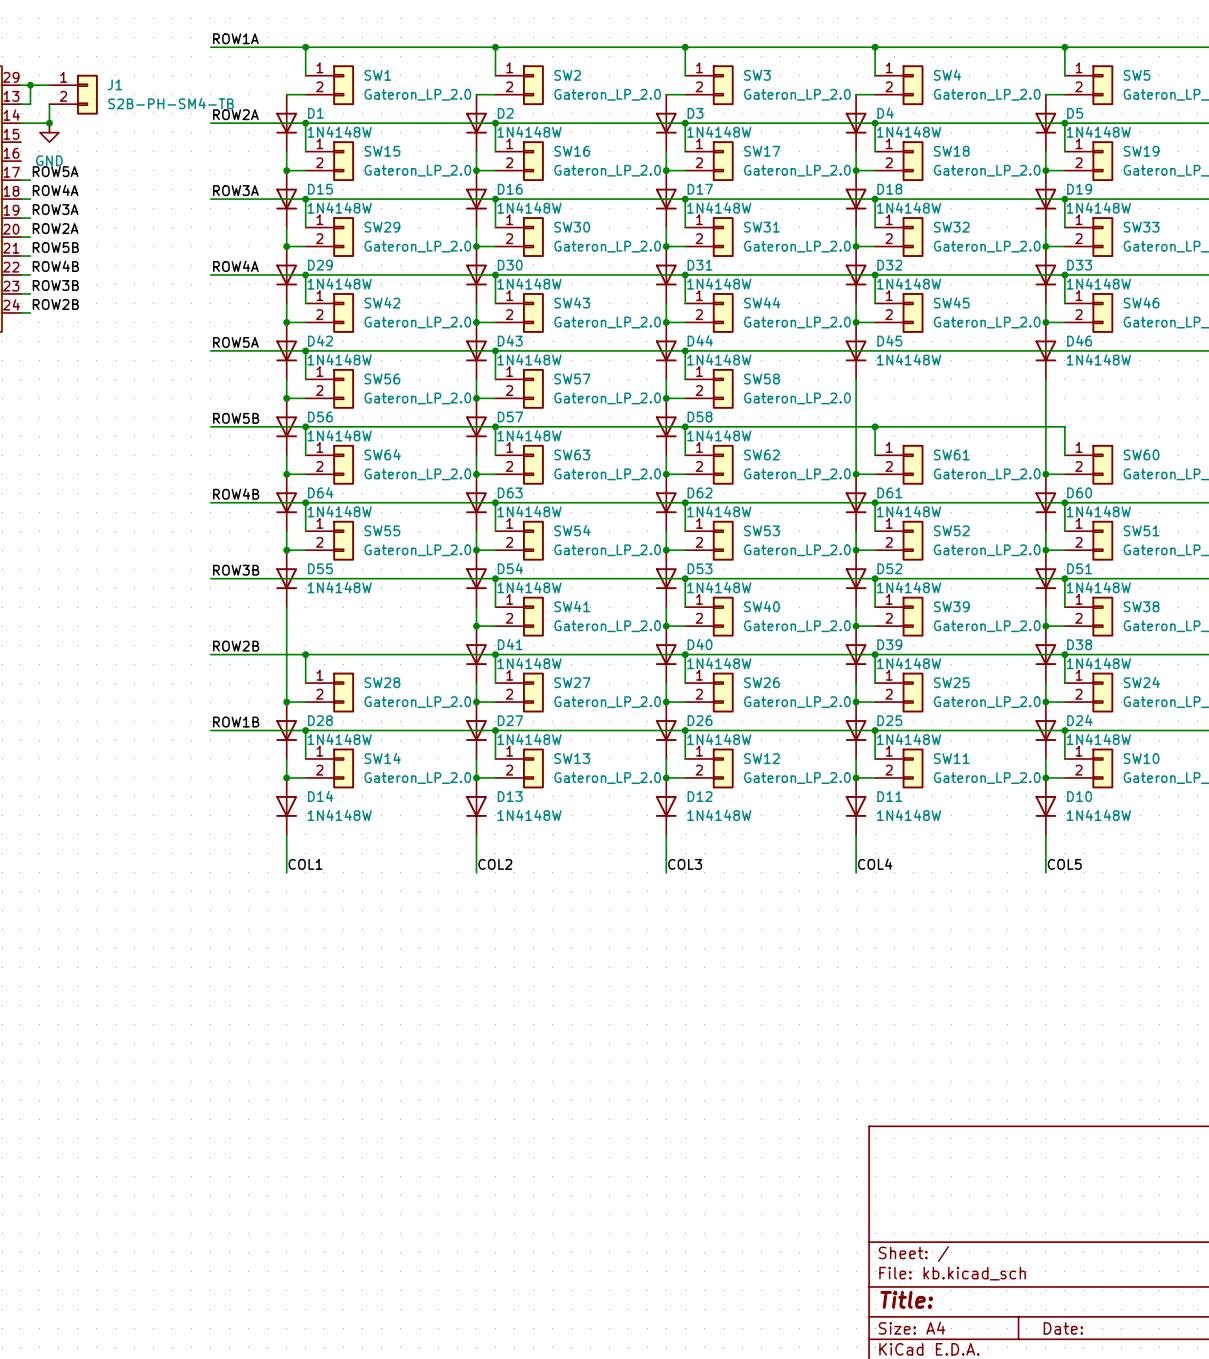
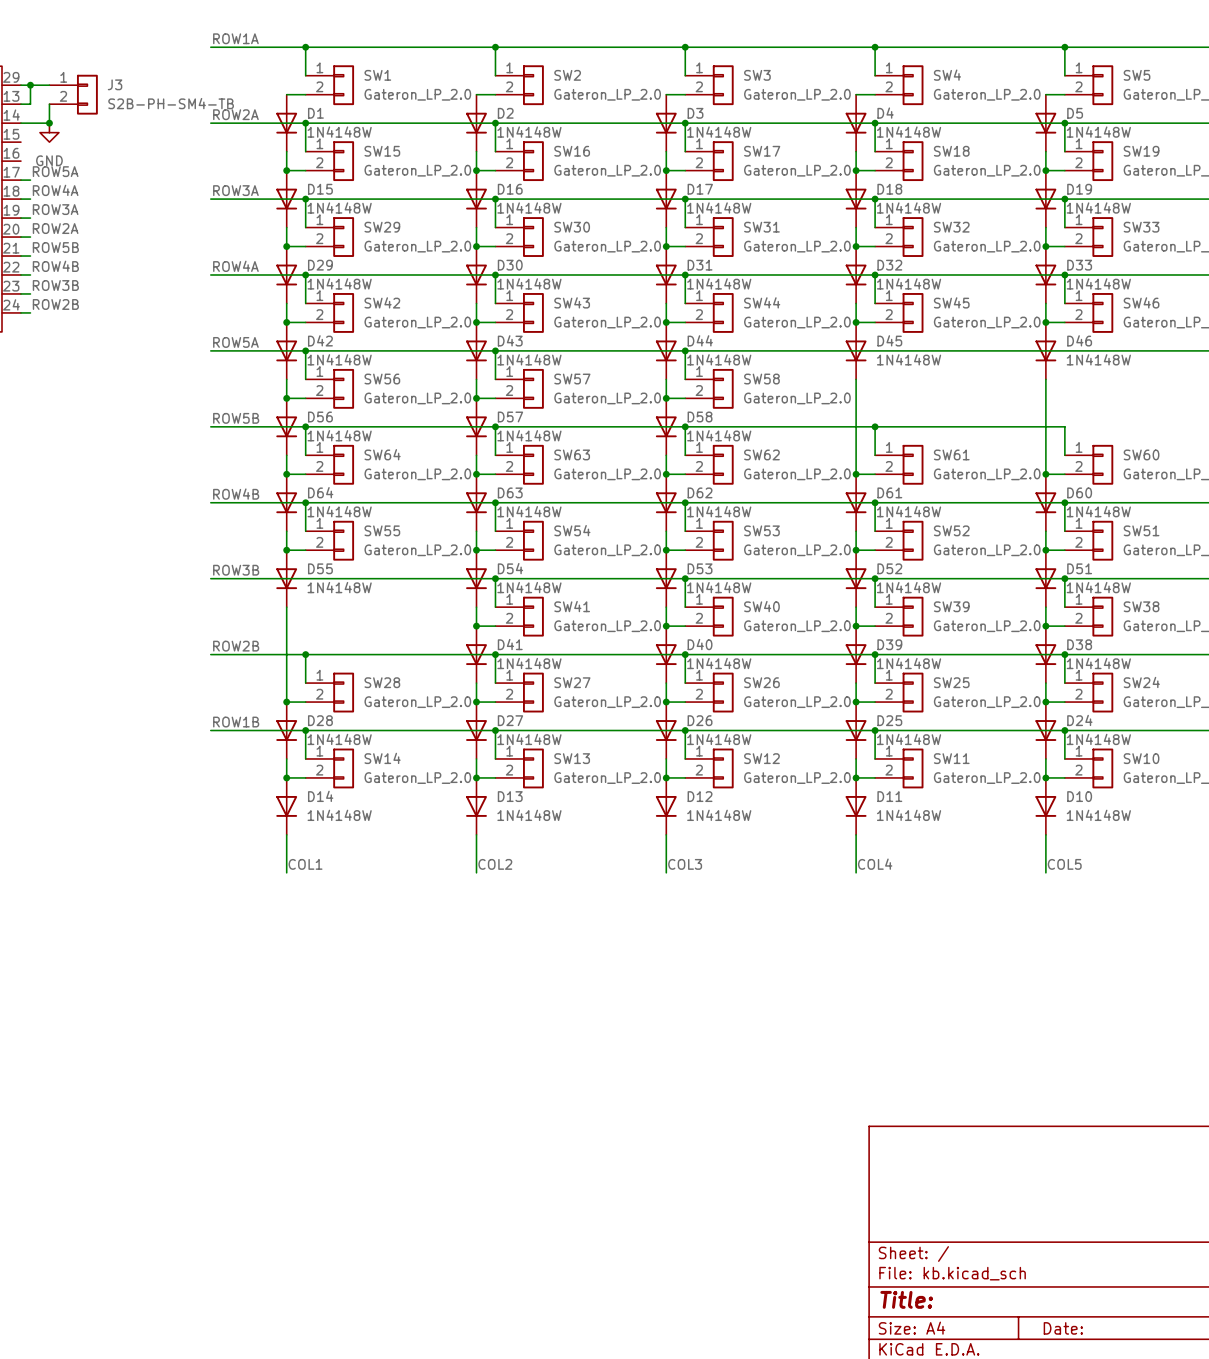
J1 name: J1 (115, 84) -> J3 (115, 84)

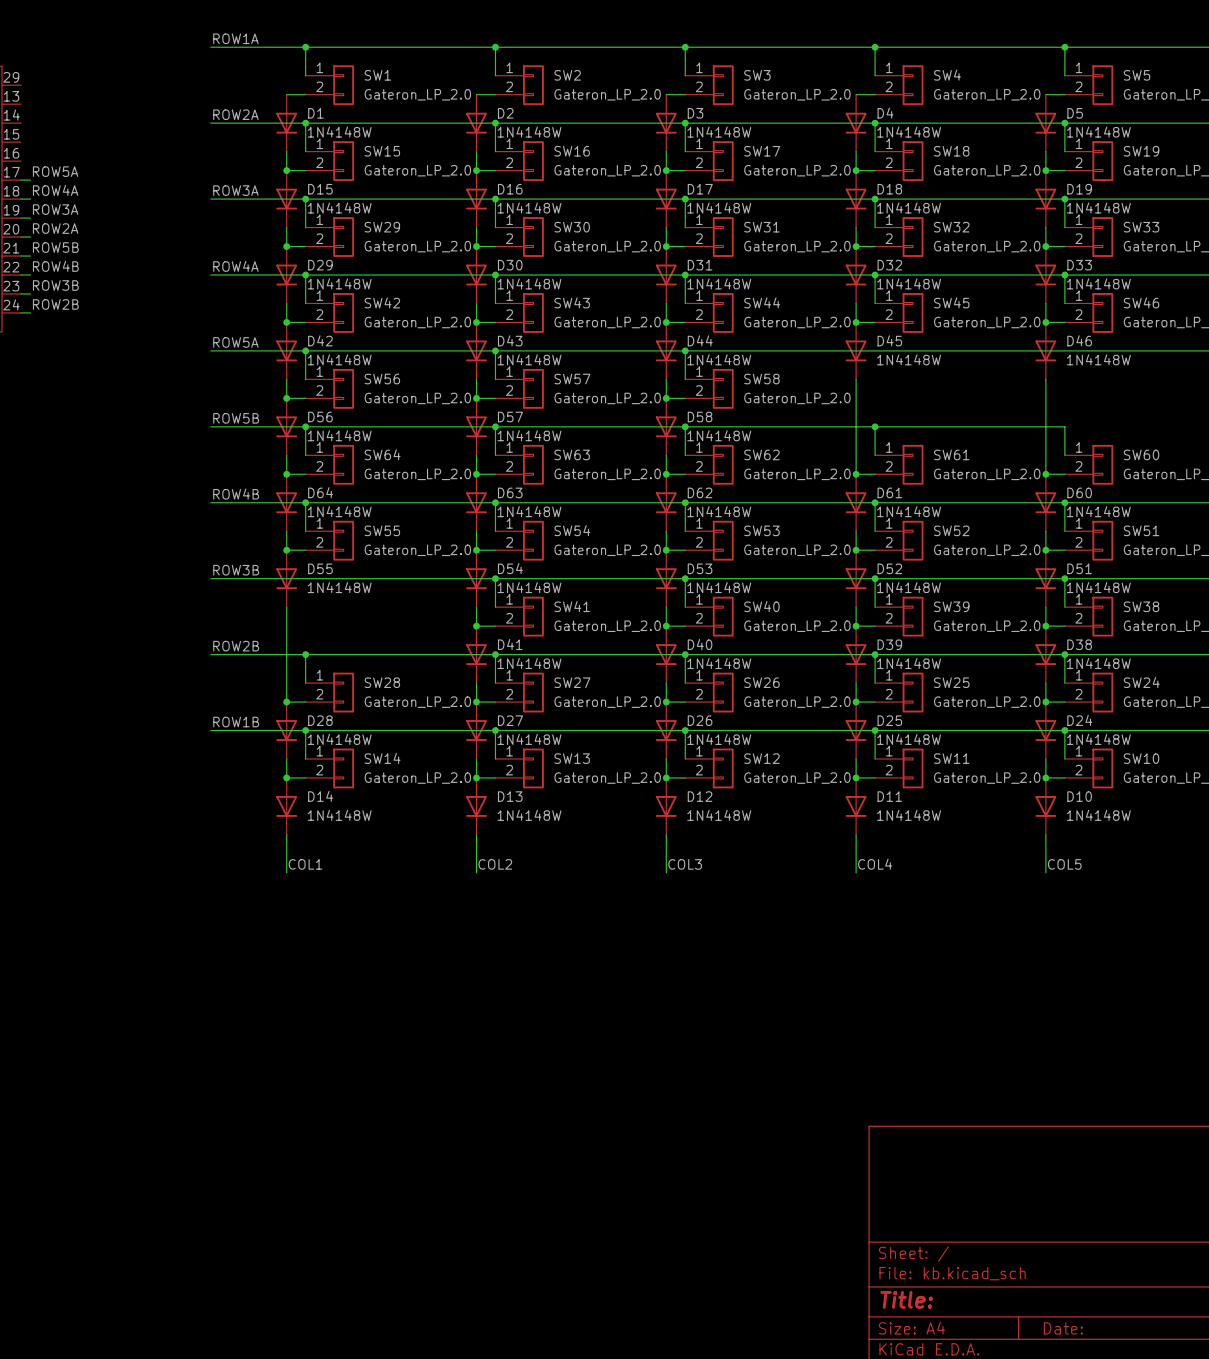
wire: (20, 85) (49, 85) -> none
wire: (30, 85) (30, 104) (20, 104) -> none
junction: (30, 85) -> none
J3: S2B-PH-SM4-TB (73, 94) -> none
wire: (49, 104) (49, 123) (20, 123) -> none
junction: (49, 123) -> none
power symbol: GND (49, 132) -> none

